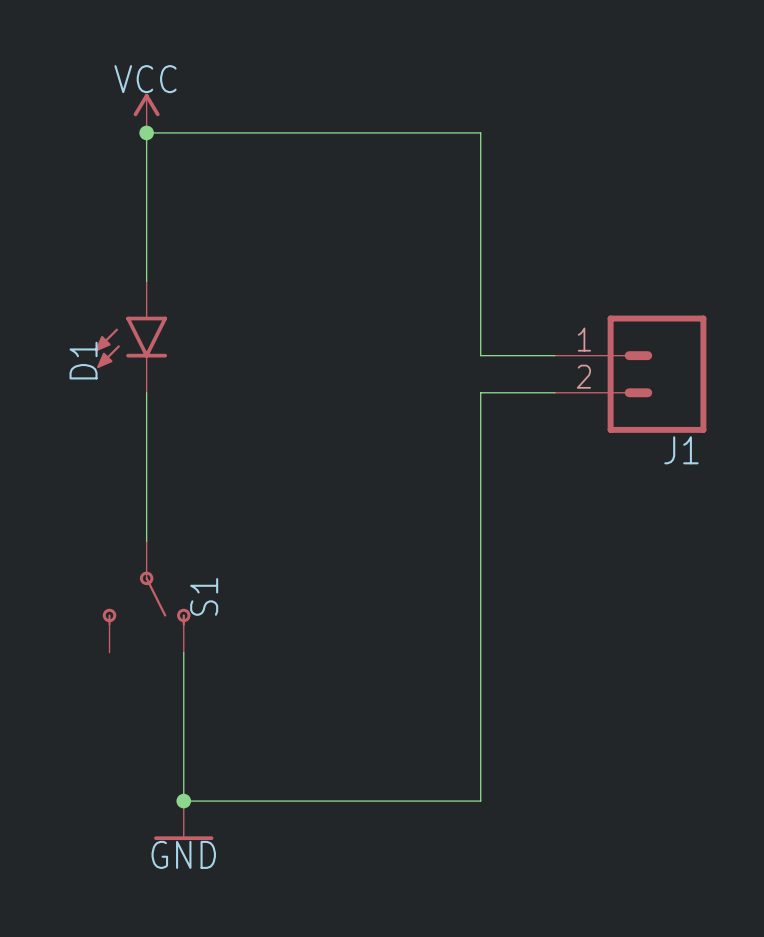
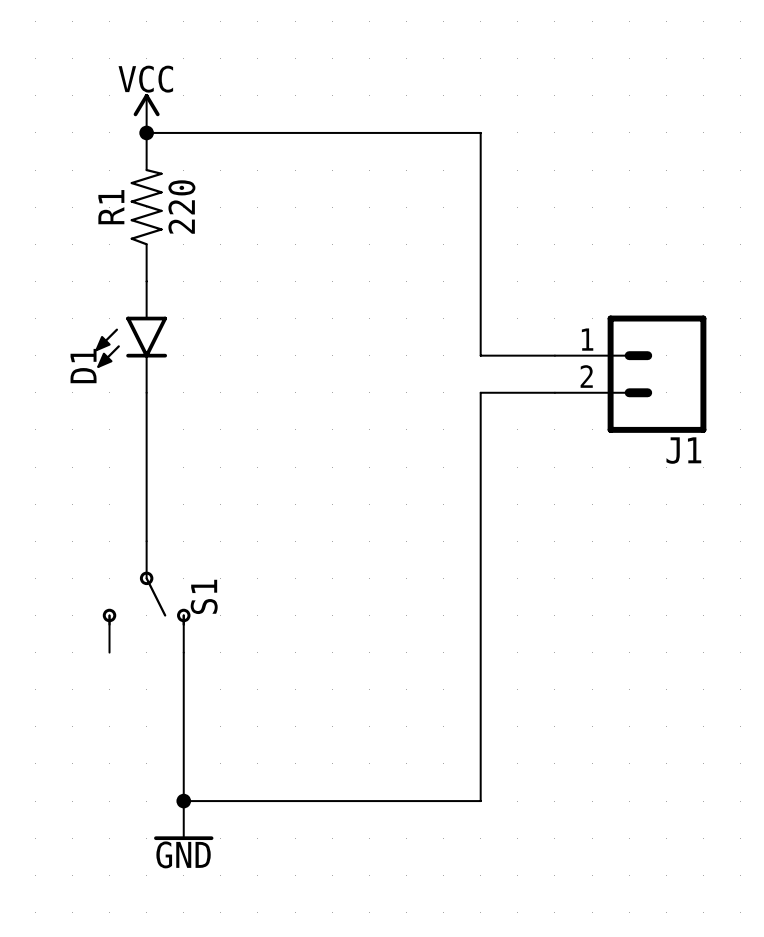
R1: none -> 220 (146, 207)

